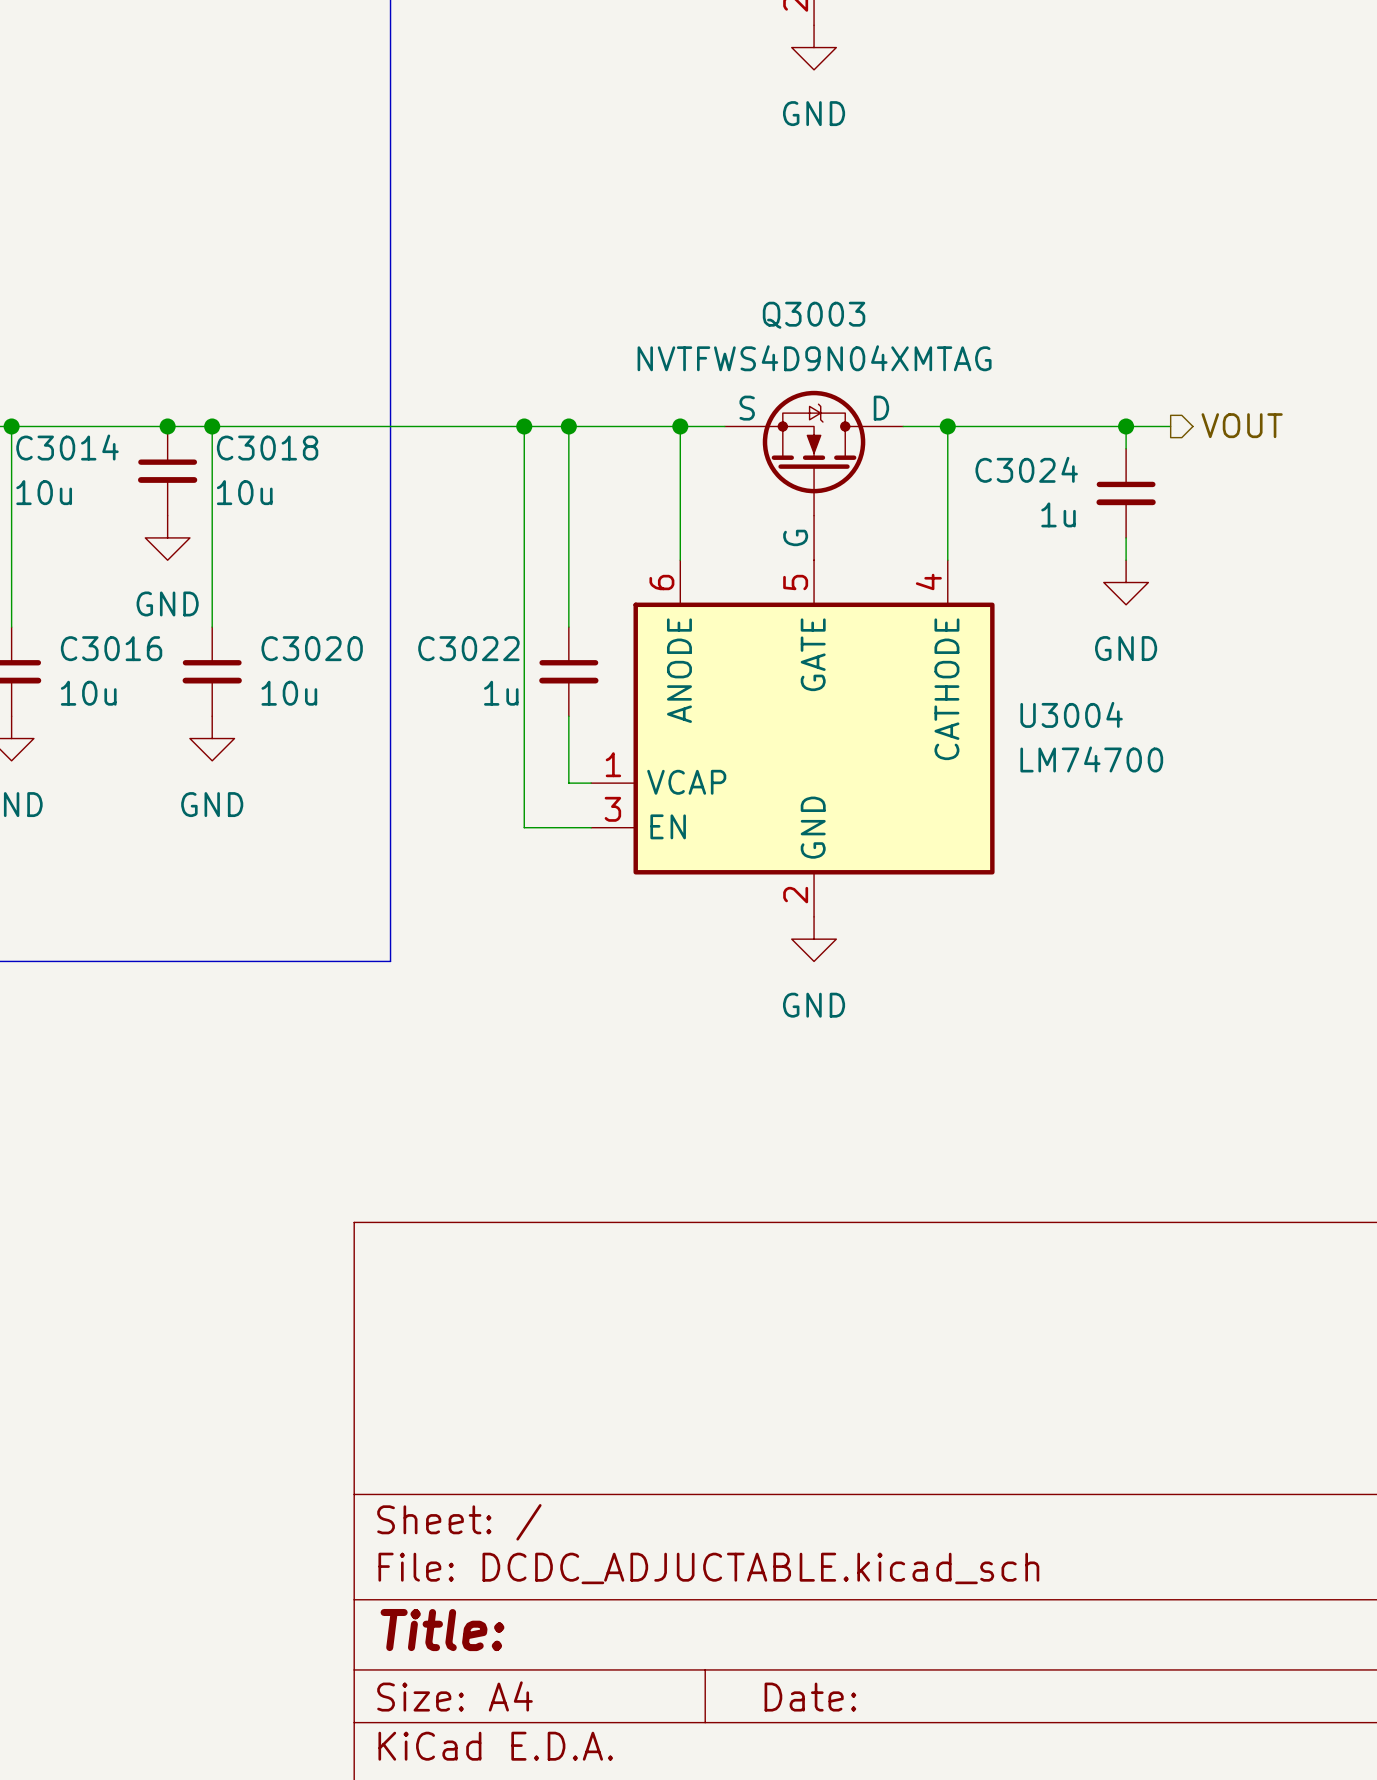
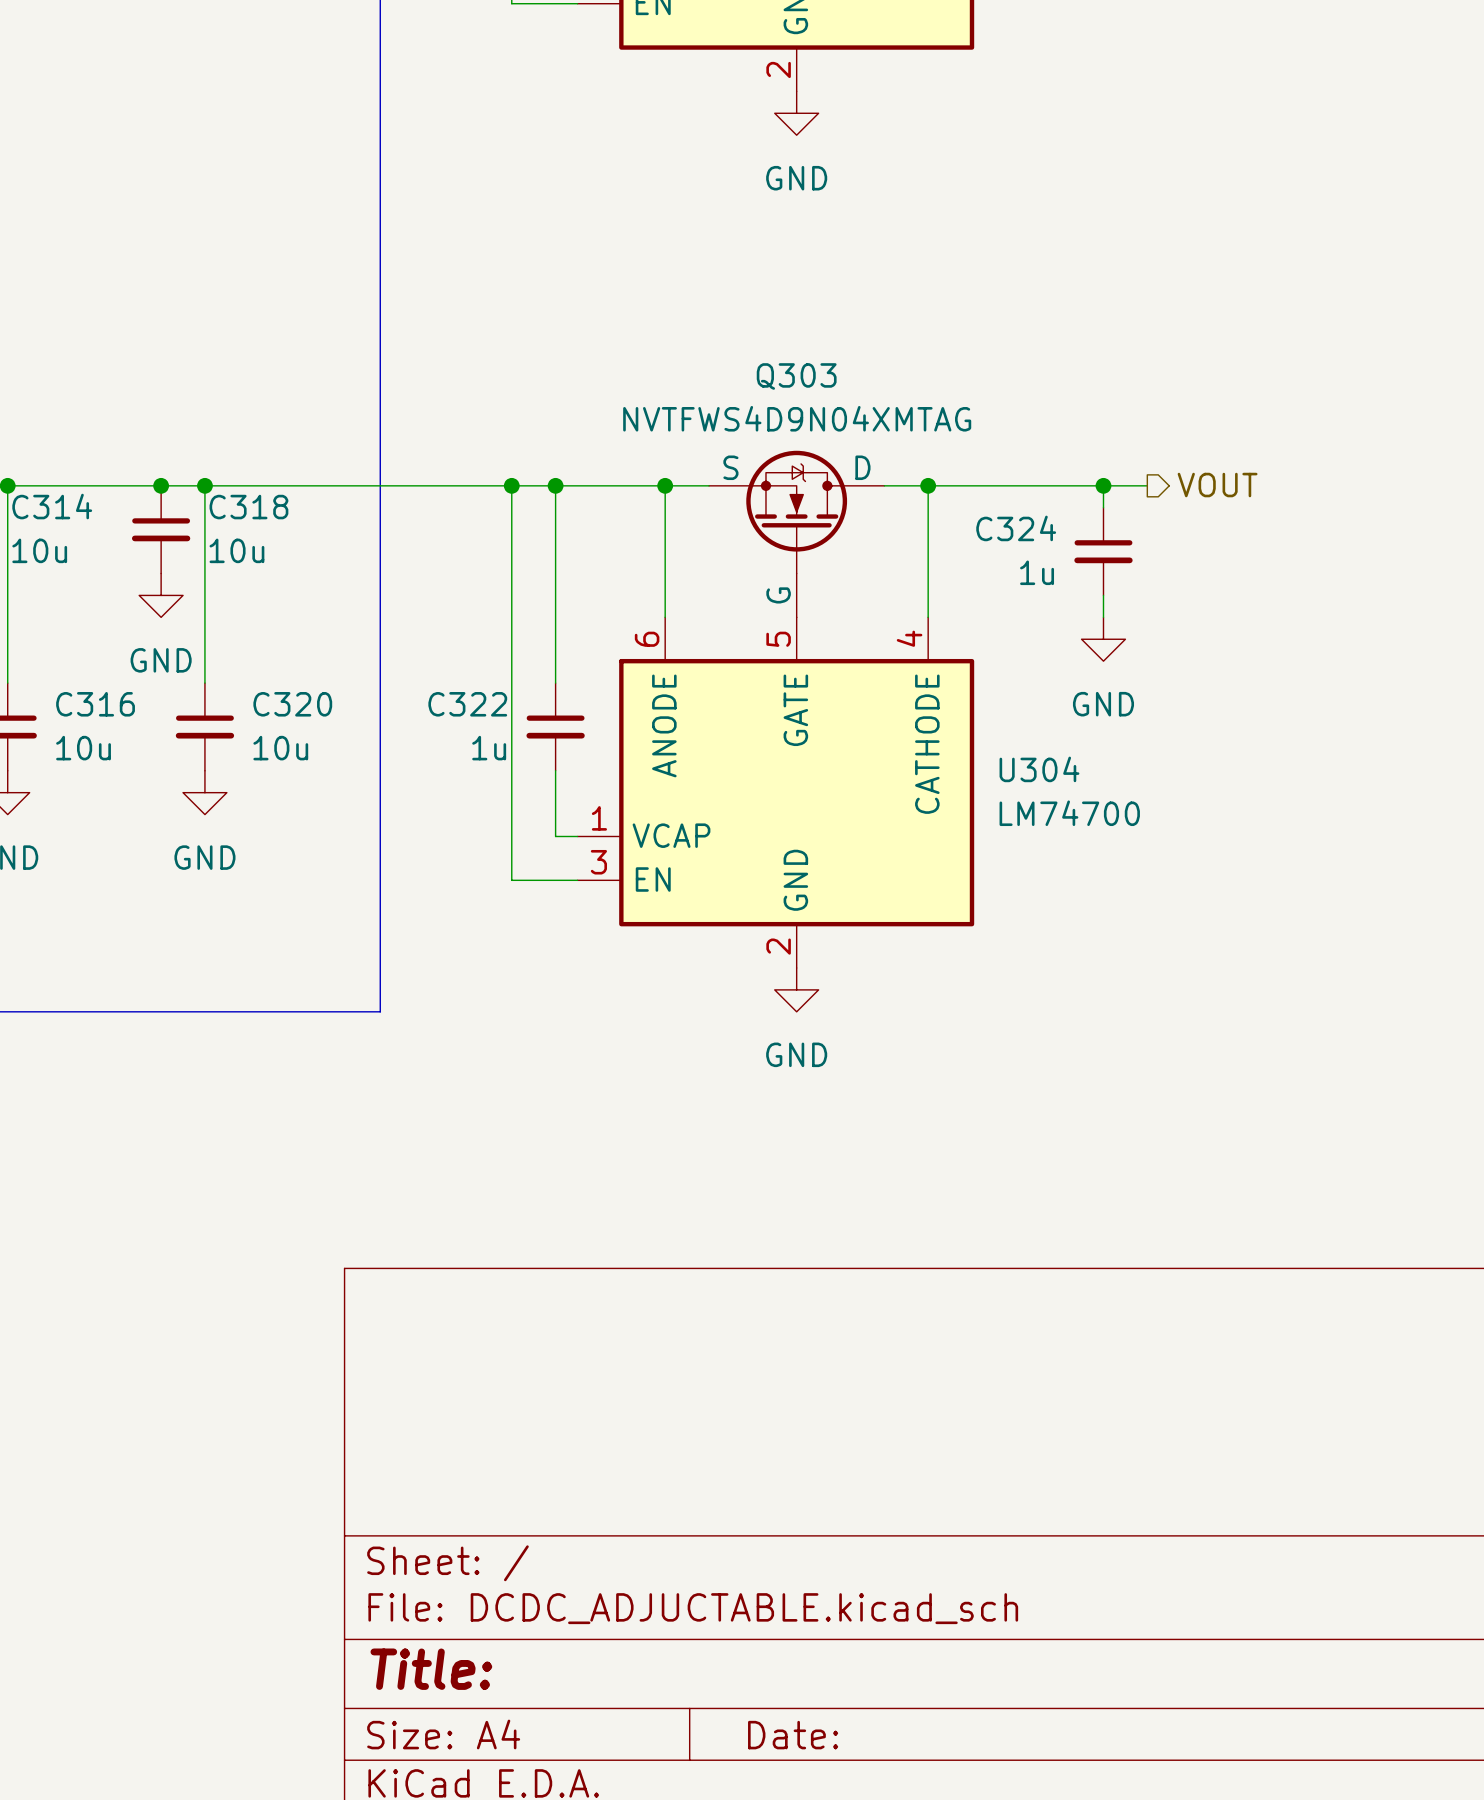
Q3003 name: Q3003 (814, 315) -> Q303 (796, 376)
C3014 name: C3014 (67, 447) -> C314 (52, 506)
C3018 name: C3018 (267, 448) -> C318 (248, 507)
C3024 name: C3024 (1026, 469) -> C324 (1016, 528)
C3016 name: C3016 (111, 648) -> C316 (95, 704)
C3020 name: C3020 (312, 648) -> C320 (292, 704)
C3022 name: C3022 (468, 648) -> C322 (467, 704)
U3004 name: U3004 (1071, 714) -> U304 (1039, 769)

